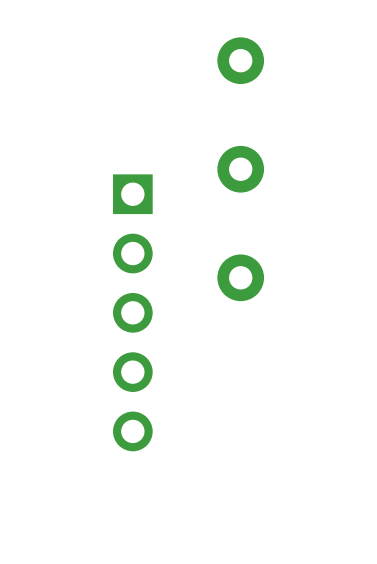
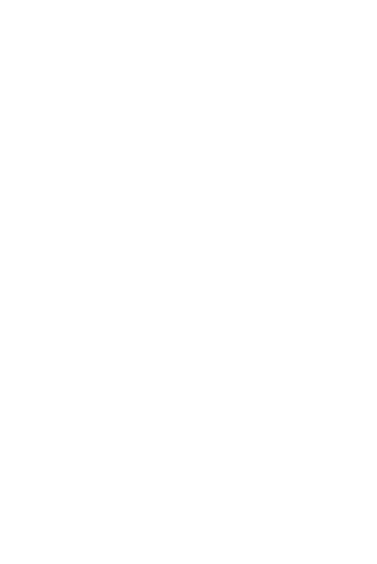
part: (240, 60) -> none
part: (240, 169) -> none
part: (240, 277) -> none
part: (132, 312) -> none

